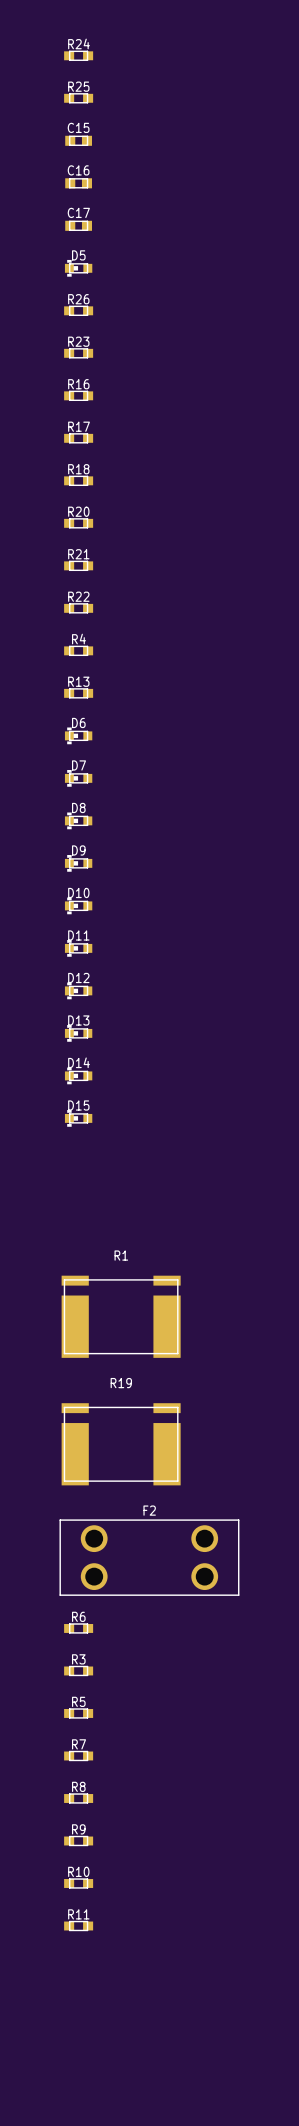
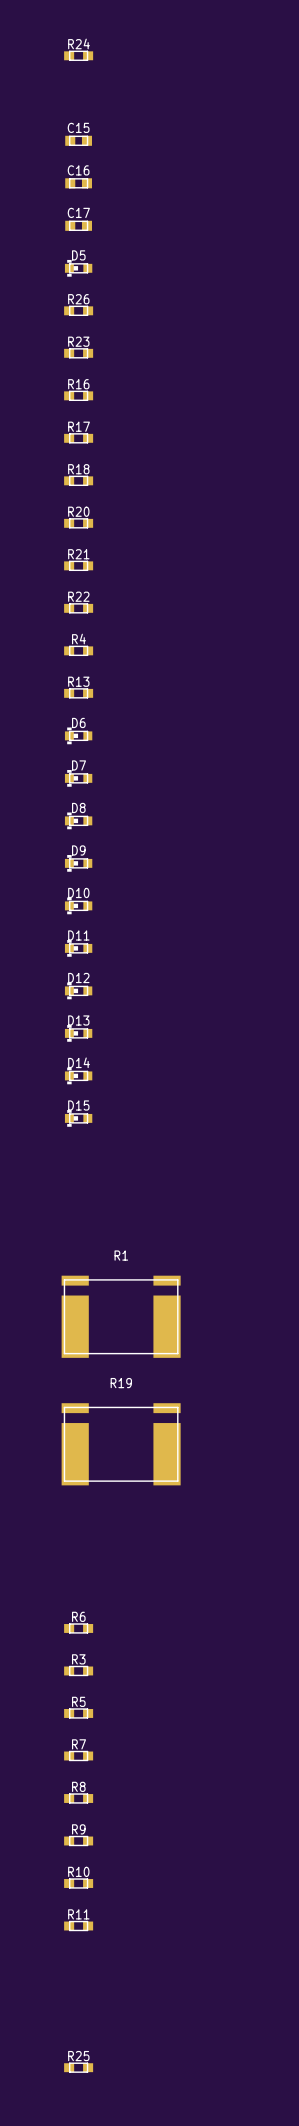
R25 position: (78, 98) -> (78, 2067)
F2: (149, 1557) -> none

